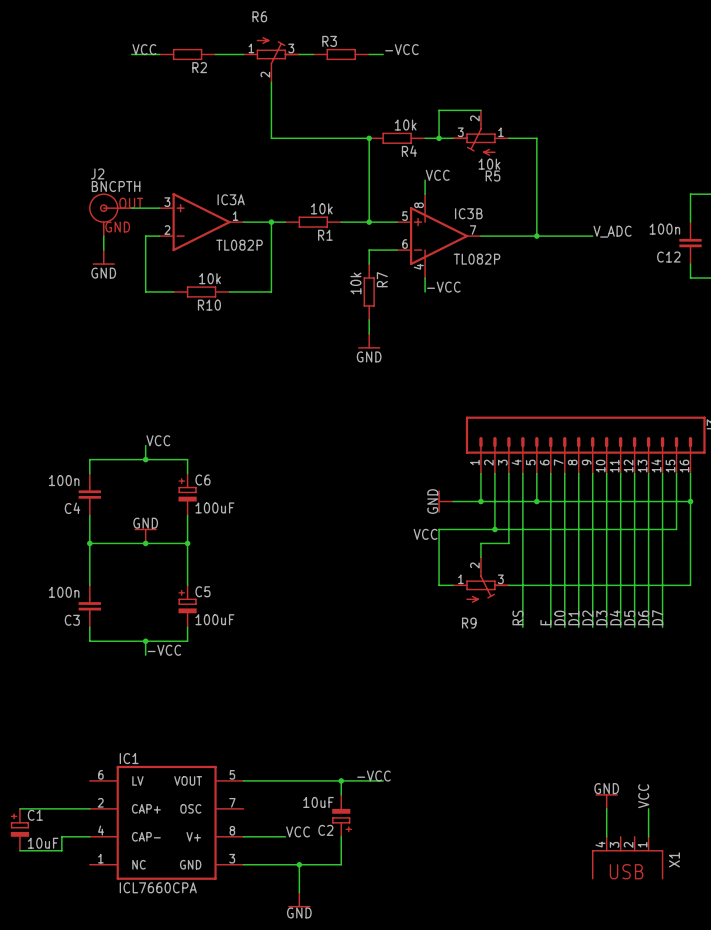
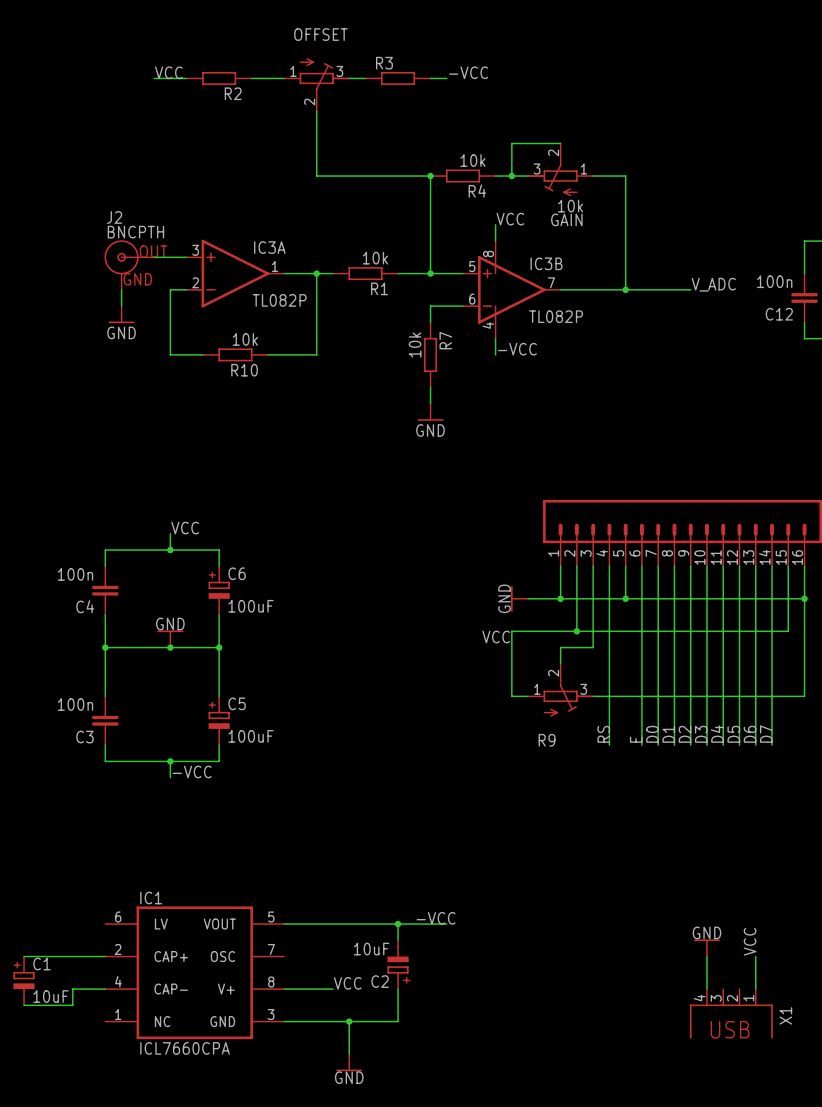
R6 name: R6 (259, 16) -> OFFSET (320, 34)
R5 name: R5 (493, 176) -> GAIN (566, 219)

